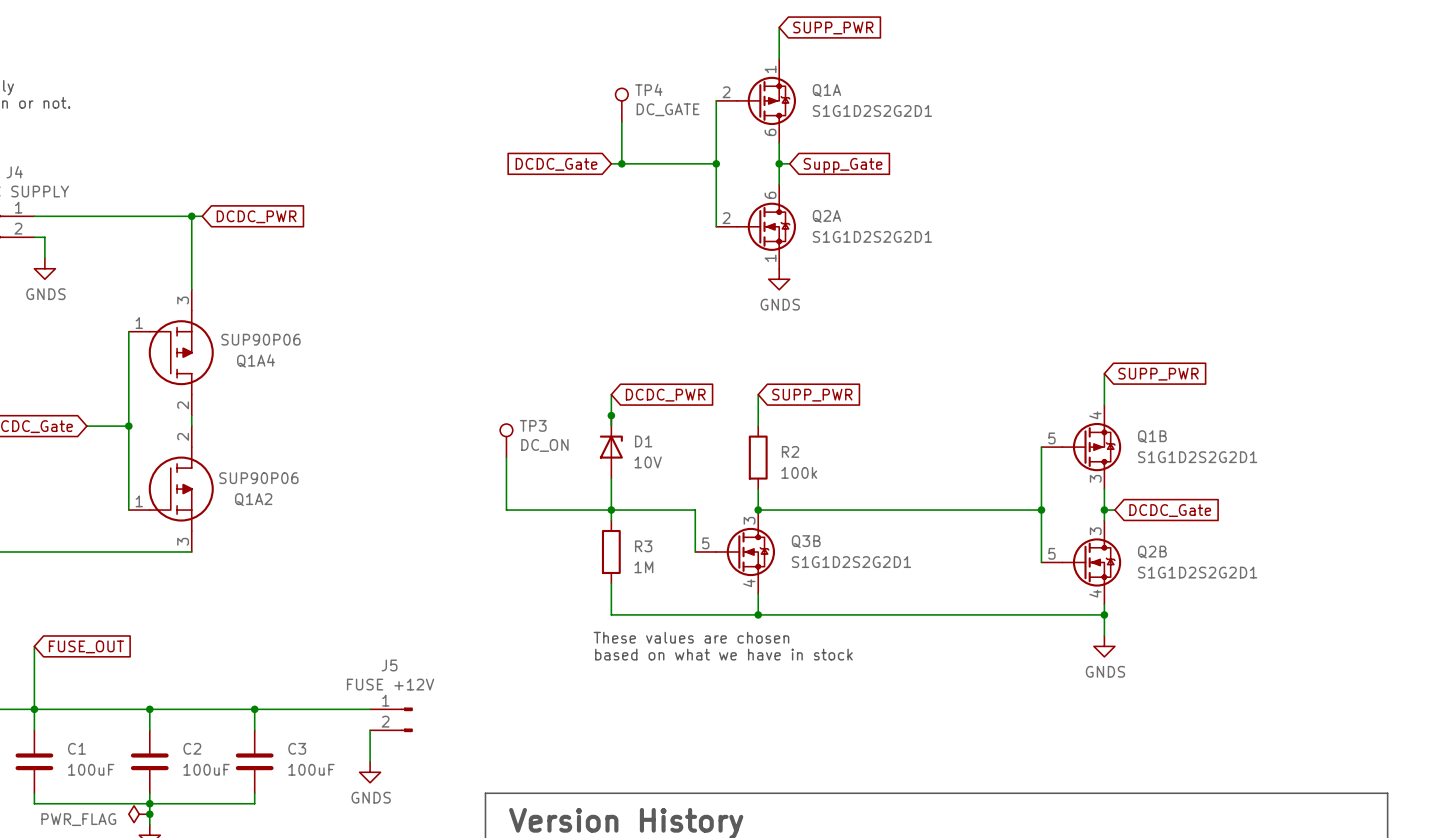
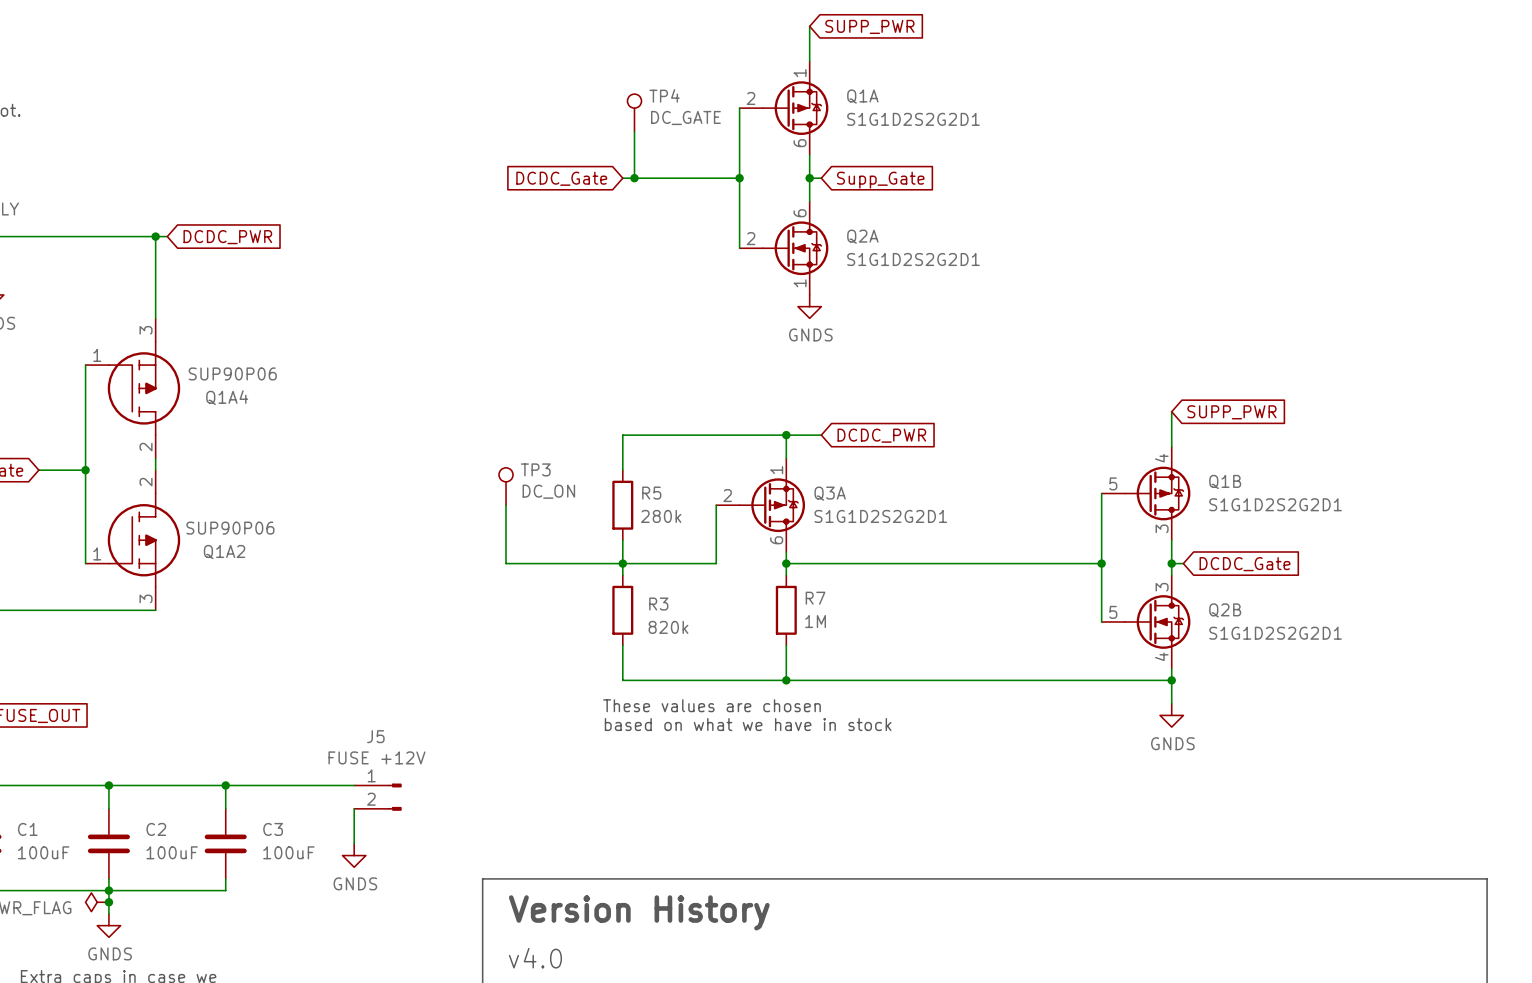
wire: none -> (622, 435) (821, 435)
junction: none -> (786, 435)
global label position: DCDC_PWR (665, 395) -> DCDC_PWR (881, 435)
global label: SUPP_PWR (812, 395) -> none
junction: (611, 415) -> none
D1: 10V (611, 447) -> none
R5: none -> 280k (622, 505)
Q3A: none -> S1G1D2S2G2D1 (760, 505)
R2: 100k (758, 457) -> none
wire: (695, 510) (695, 551) -> (716, 563) (716, 505)
Q3B: S1G1D2S2G2D1 (735, 551) -> none
R7: none -> 1M (786, 610)
R3 value: 1M (643, 567) -> 820k (668, 627)

